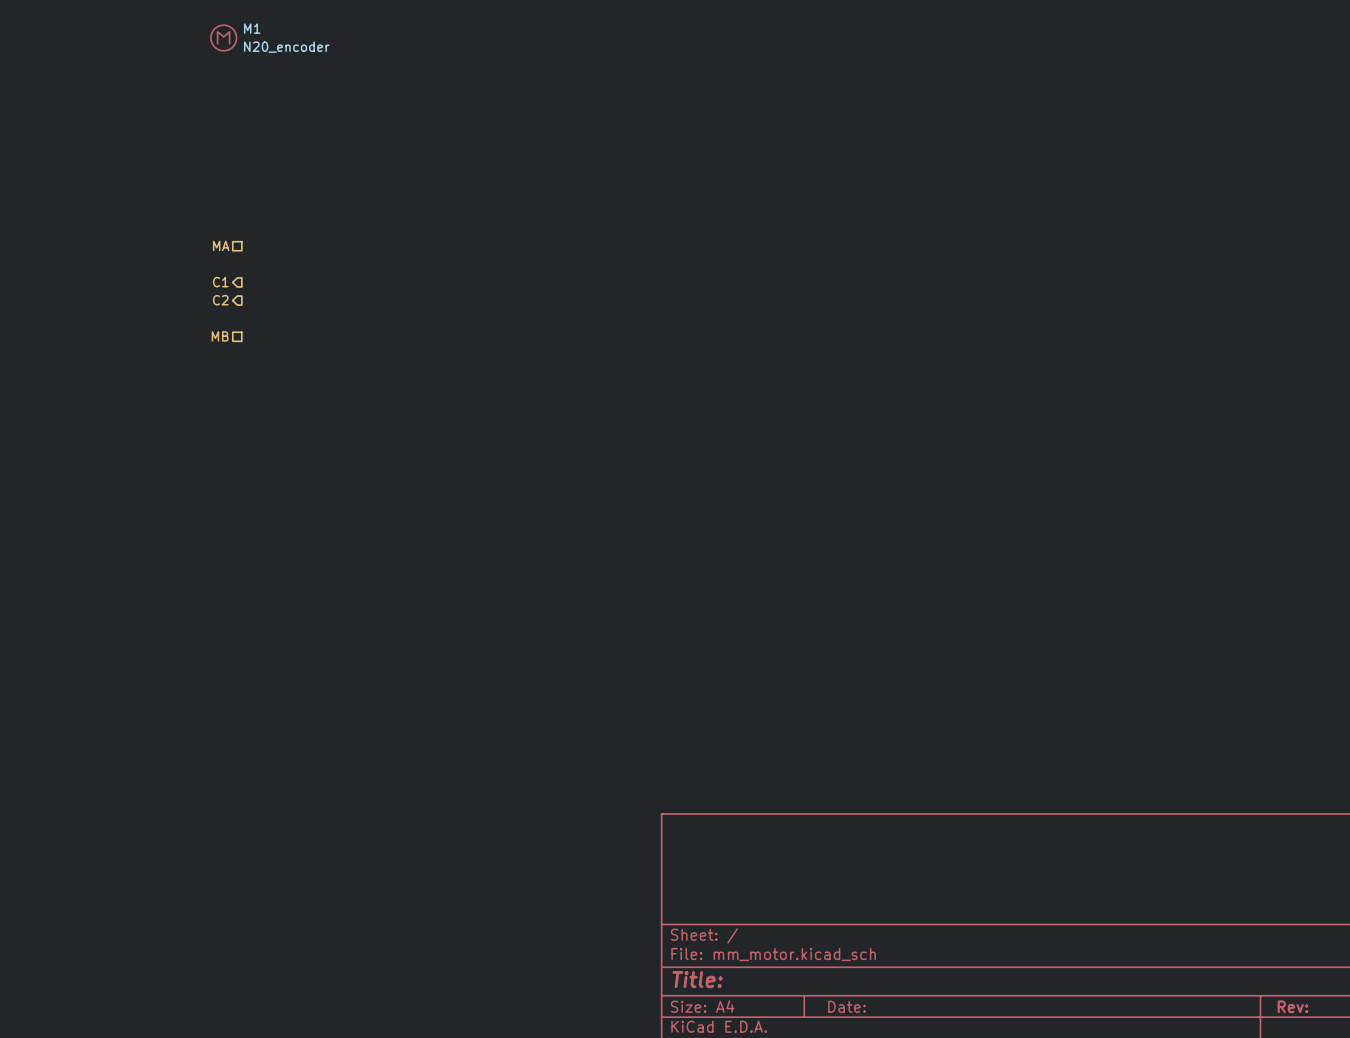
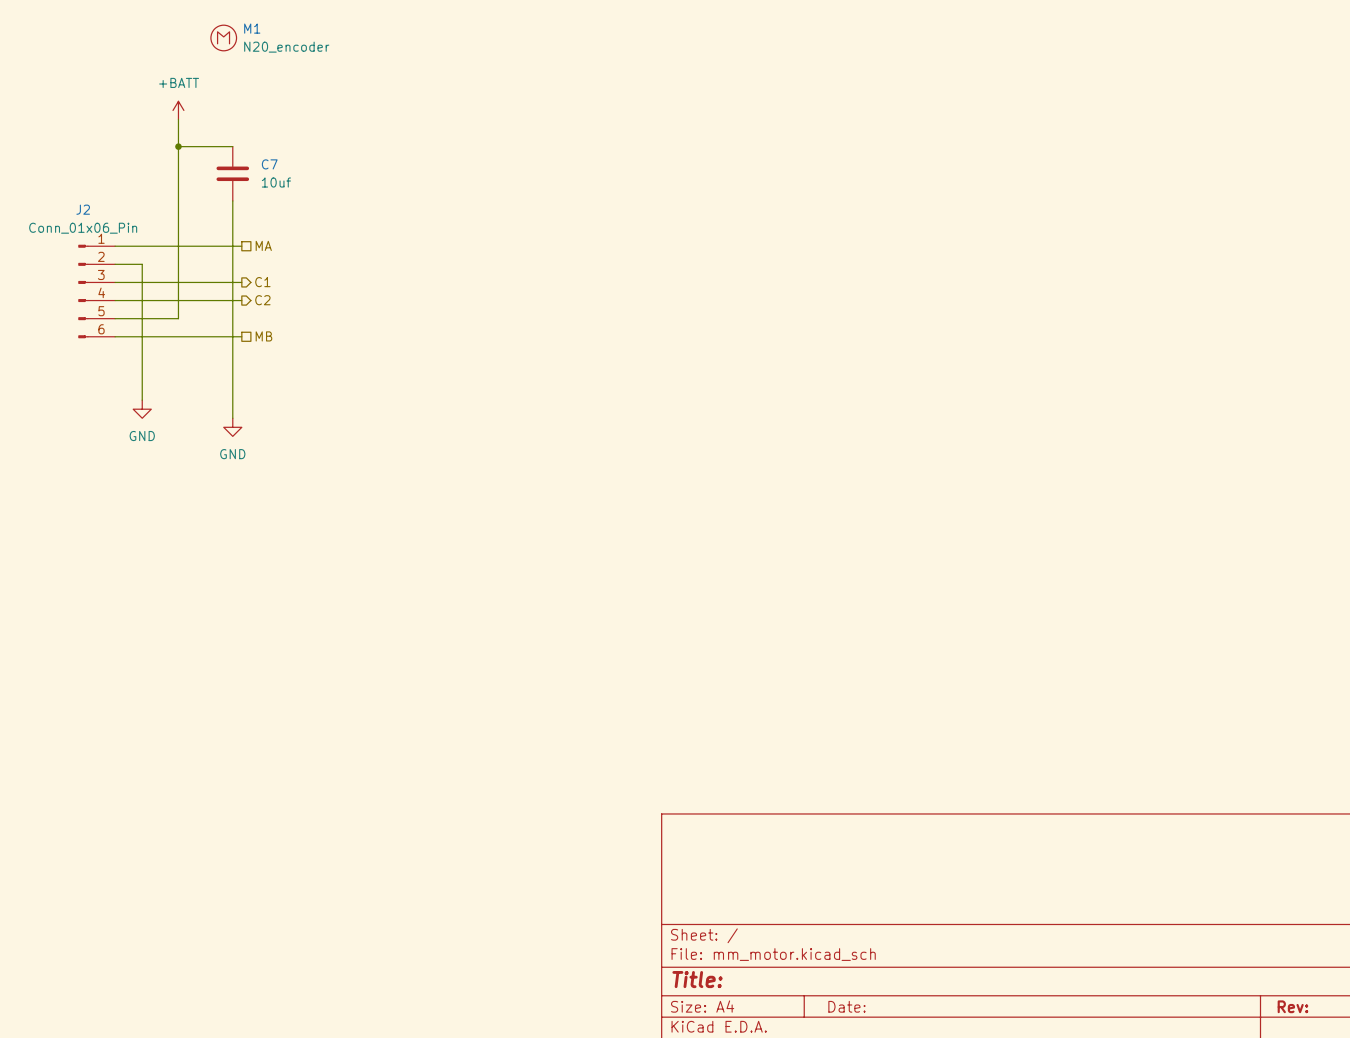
power symbol: none -> +BATT (178, 110)
wire: none -> (178, 119) (178, 318) (115, 318)
wire: none -> (178, 146) (232, 146)
junction: none -> (178, 146)
C7: none -> 10uf (232, 173)
wire: none -> (232, 200) (232, 418)
hierarchical label rotation: 0° (221, 245) -> 180° (263, 245)
hierarchical label position: MA (221, 245) -> MA (263, 245)
wire: none -> (115, 246) (241, 246)
wire: none -> (115, 264) (142, 264) (142, 400)
wire: none -> (115, 282) (241, 282)
hierarchical label rotation: 0° (220, 282) -> 180° (262, 282)
hierarchical label position: C1 (220, 282) -> C1 (262, 282)
J2: none -> Conn_01x06_Pin (96, 291)
wire: none -> (115, 300) (241, 300)
hierarchical label rotation: 0° (220, 300) -> 180° (262, 300)
hierarchical label position: C2 (220, 300) -> C2 (262, 300)
wire: none -> (115, 336) (241, 336)
hierarchical label rotation: 0° (220, 336) -> 180° (263, 336)
hierarchical label position: MB (220, 336) -> MB (263, 336)
power symbol: none -> GND (142, 409)
power symbol: none -> GND (232, 427)

